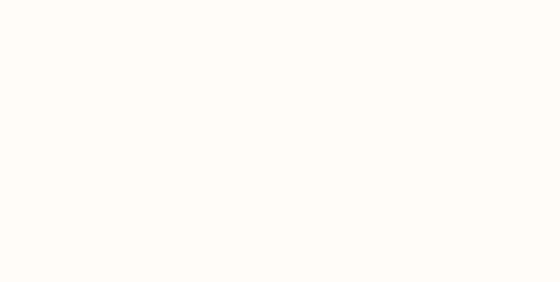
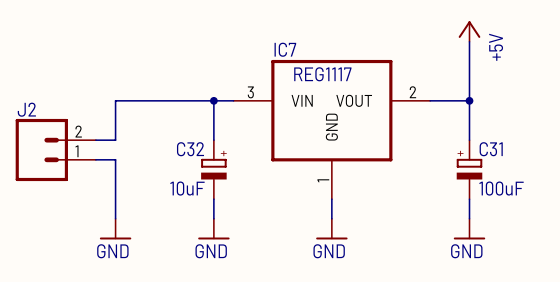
power symbol: none -> +5V (469, 31)
wire: none -> (469, 41) (469, 140)
wire: none -> (213, 100) (213, 140)
junction: none -> (213, 100)
wire: none -> (233, 100) (115, 100) (115, 140) (95, 140)
wire: none -> (430, 100) (469, 100)
junction: none -> (469, 100)
IC7: none -> REG1117 (331, 129)
J2: none -> (55, 150)
wire: none -> (95, 159) (115, 159) (115, 218)
C32: none -> 10uF (213, 169)
C31: none -> 100uF (469, 169)
wire: none -> (213, 199) (213, 218)
wire: none -> (331, 199) (331, 218)
wire: none -> (469, 199) (469, 218)
power symbol: none -> GND (115, 229)
power symbol: none -> GND (213, 229)
power symbol: none -> GND (331, 229)
power symbol: none -> GND (469, 229)

